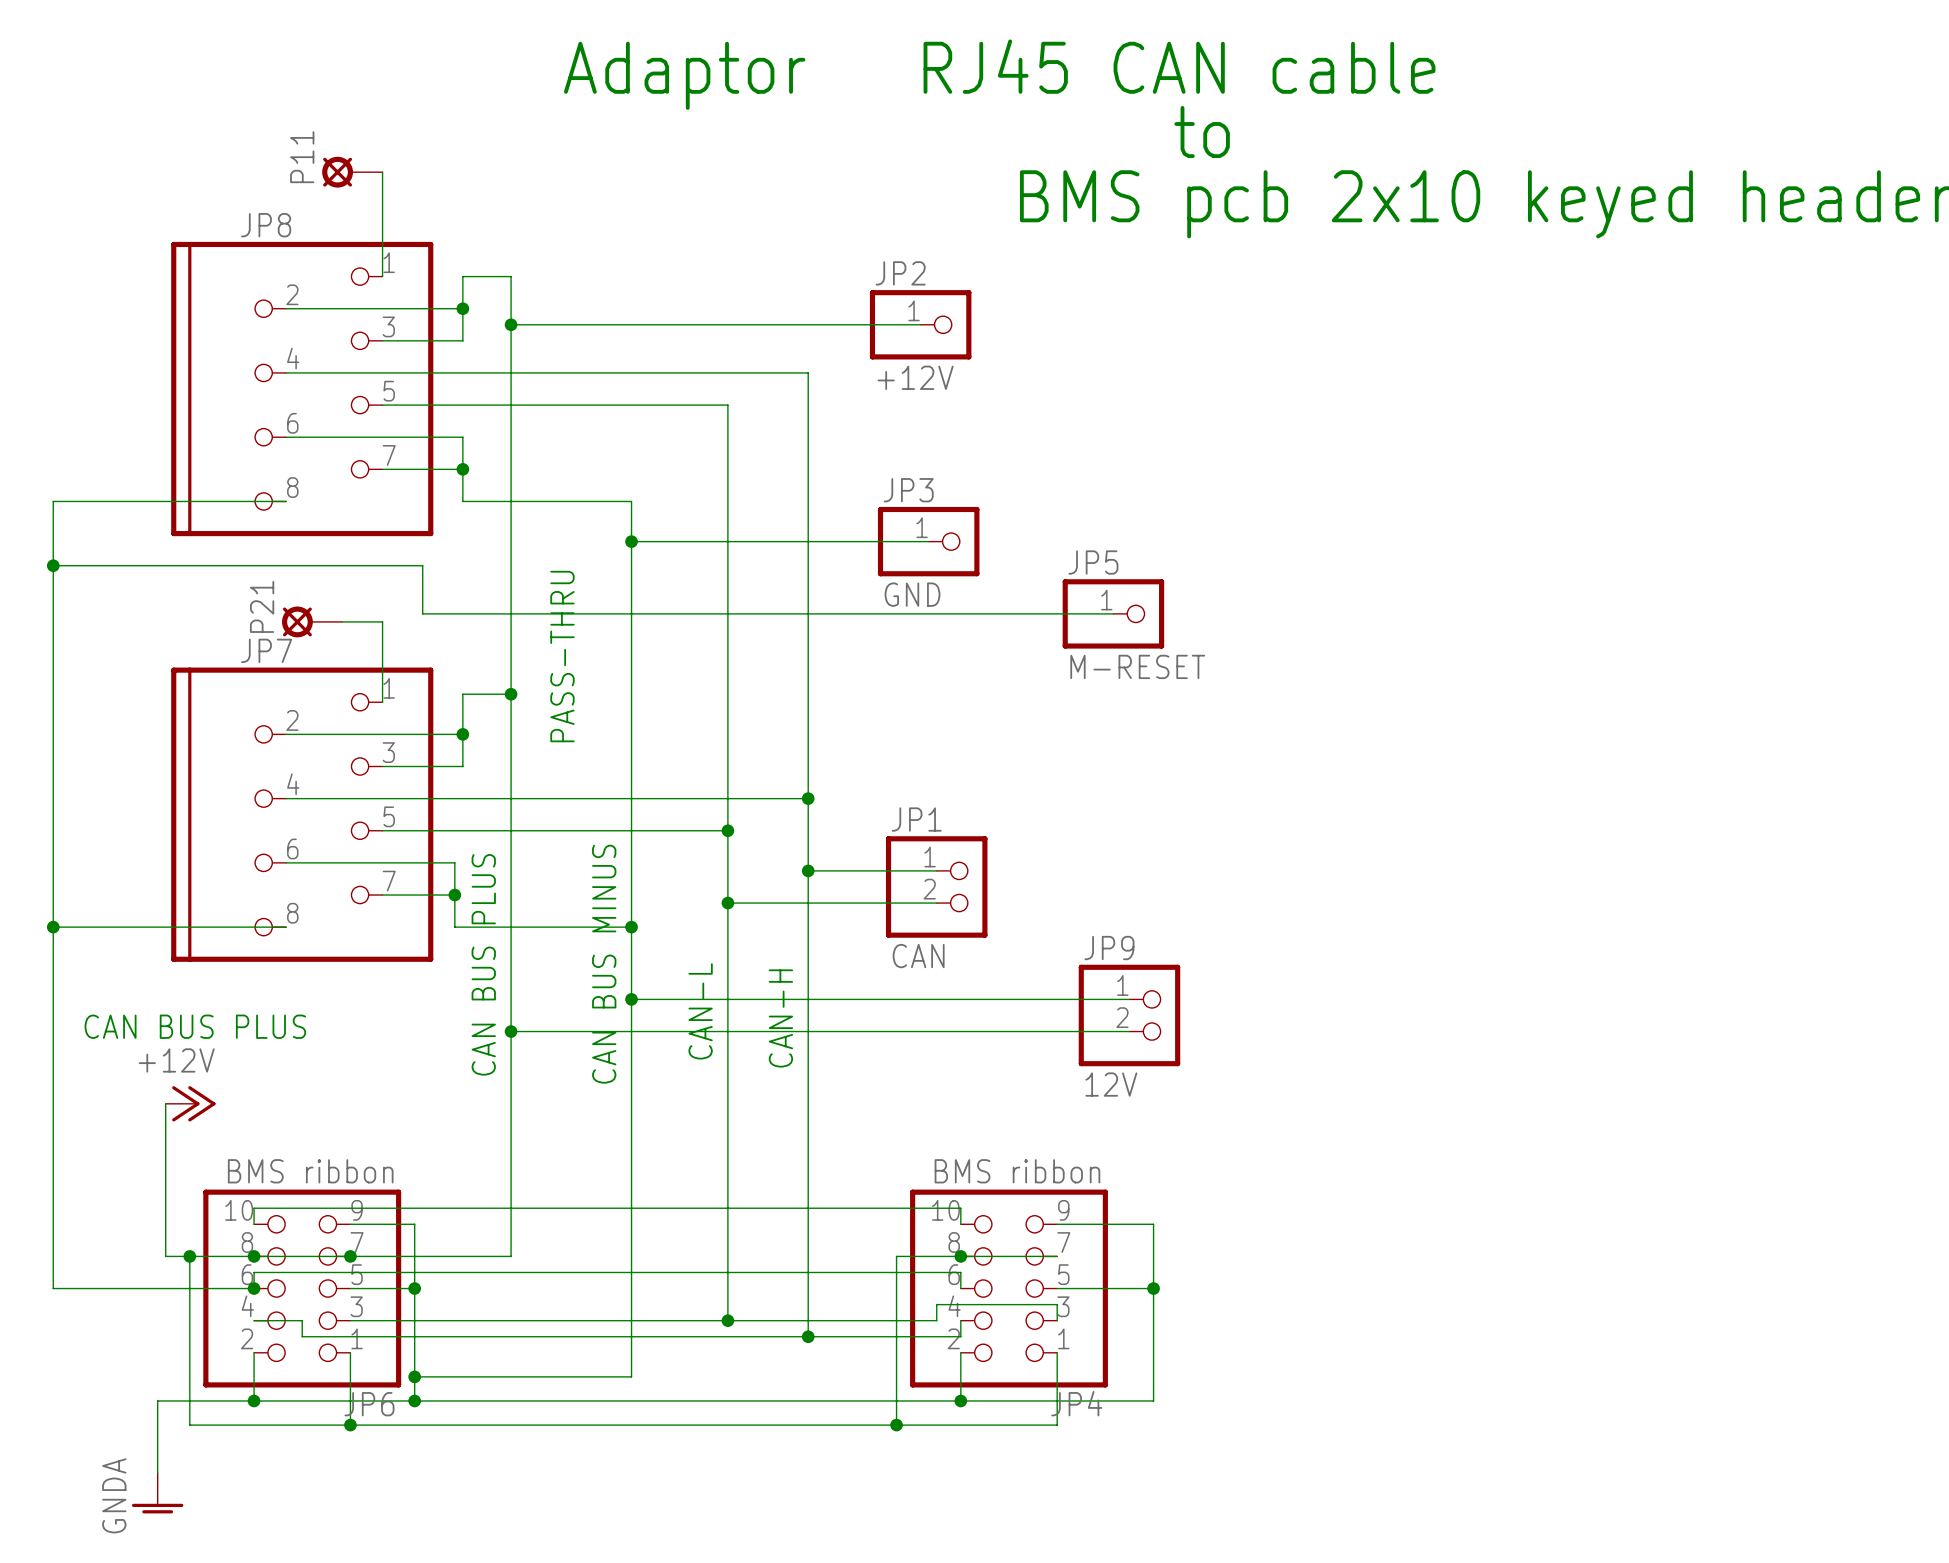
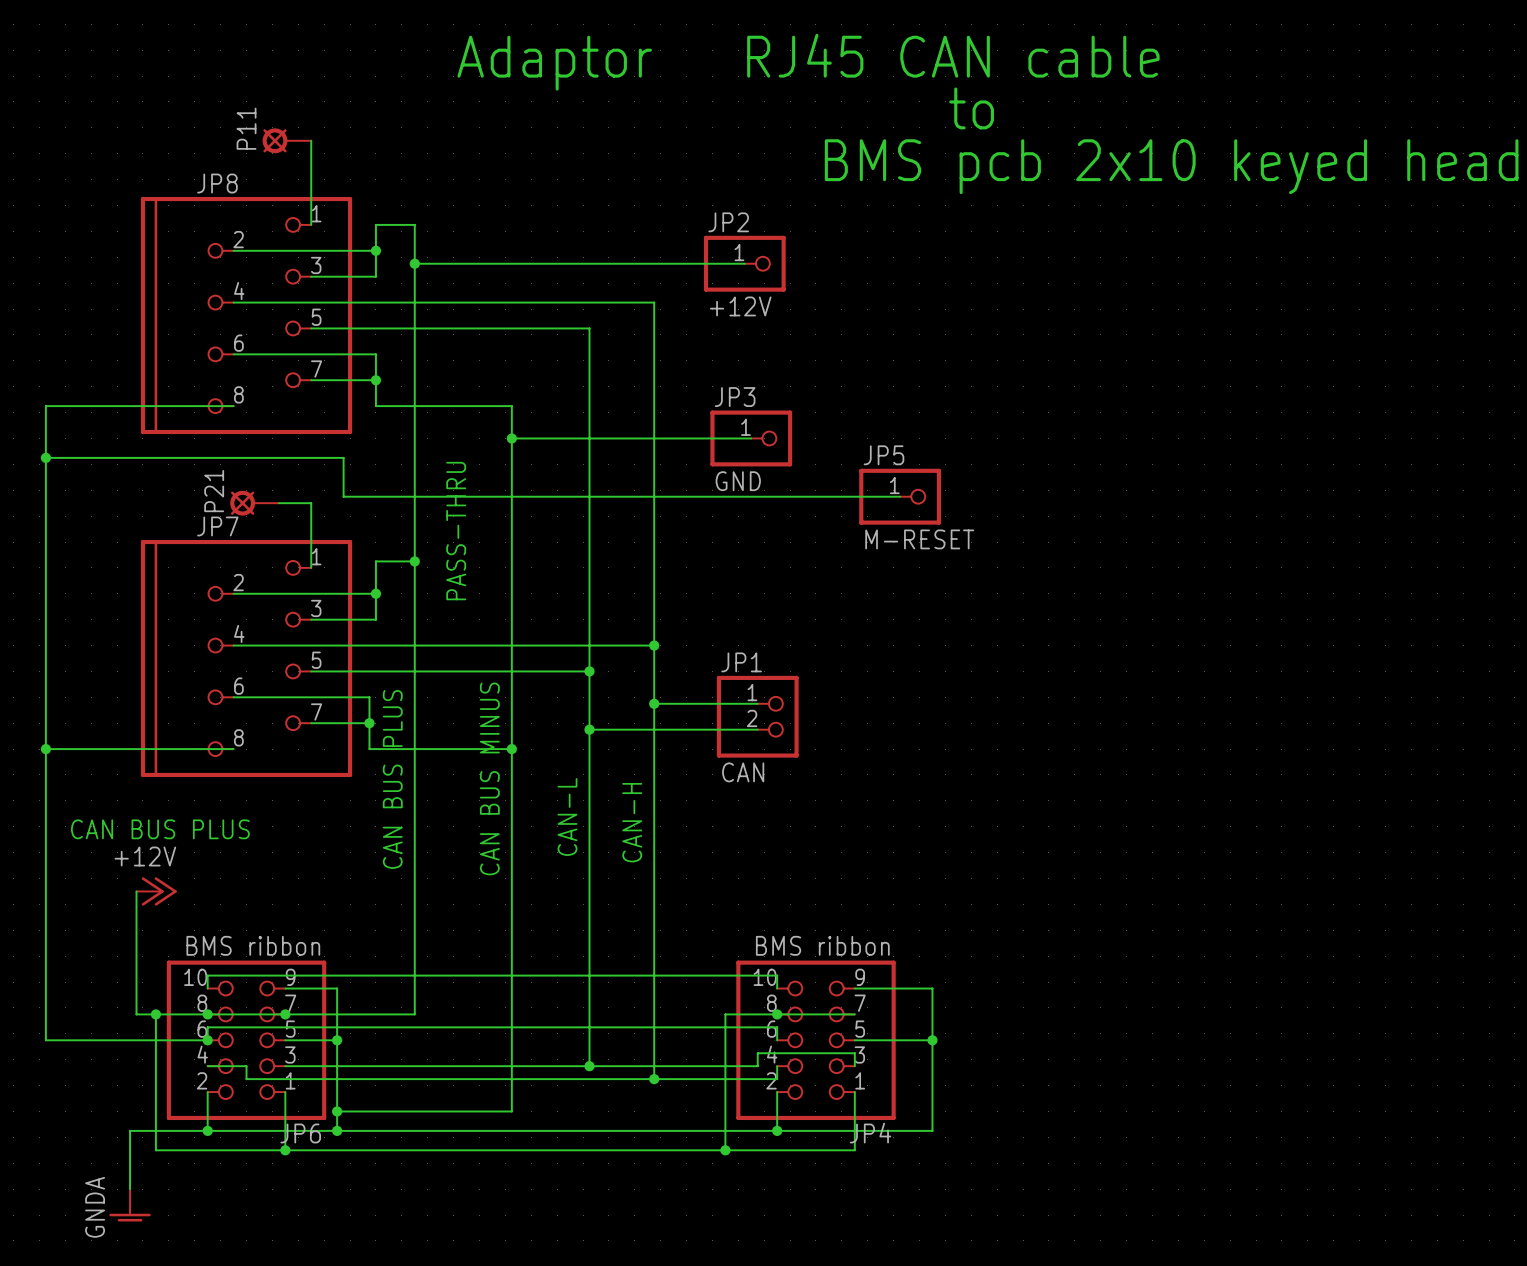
wire: (631, 999) (1129, 999) -> none
junction: (631, 999) -> none
JP9: 12V (1129, 1015) -> none
wire: (511, 1031) (1129, 1031) -> none
junction: (511, 1031) -> none

